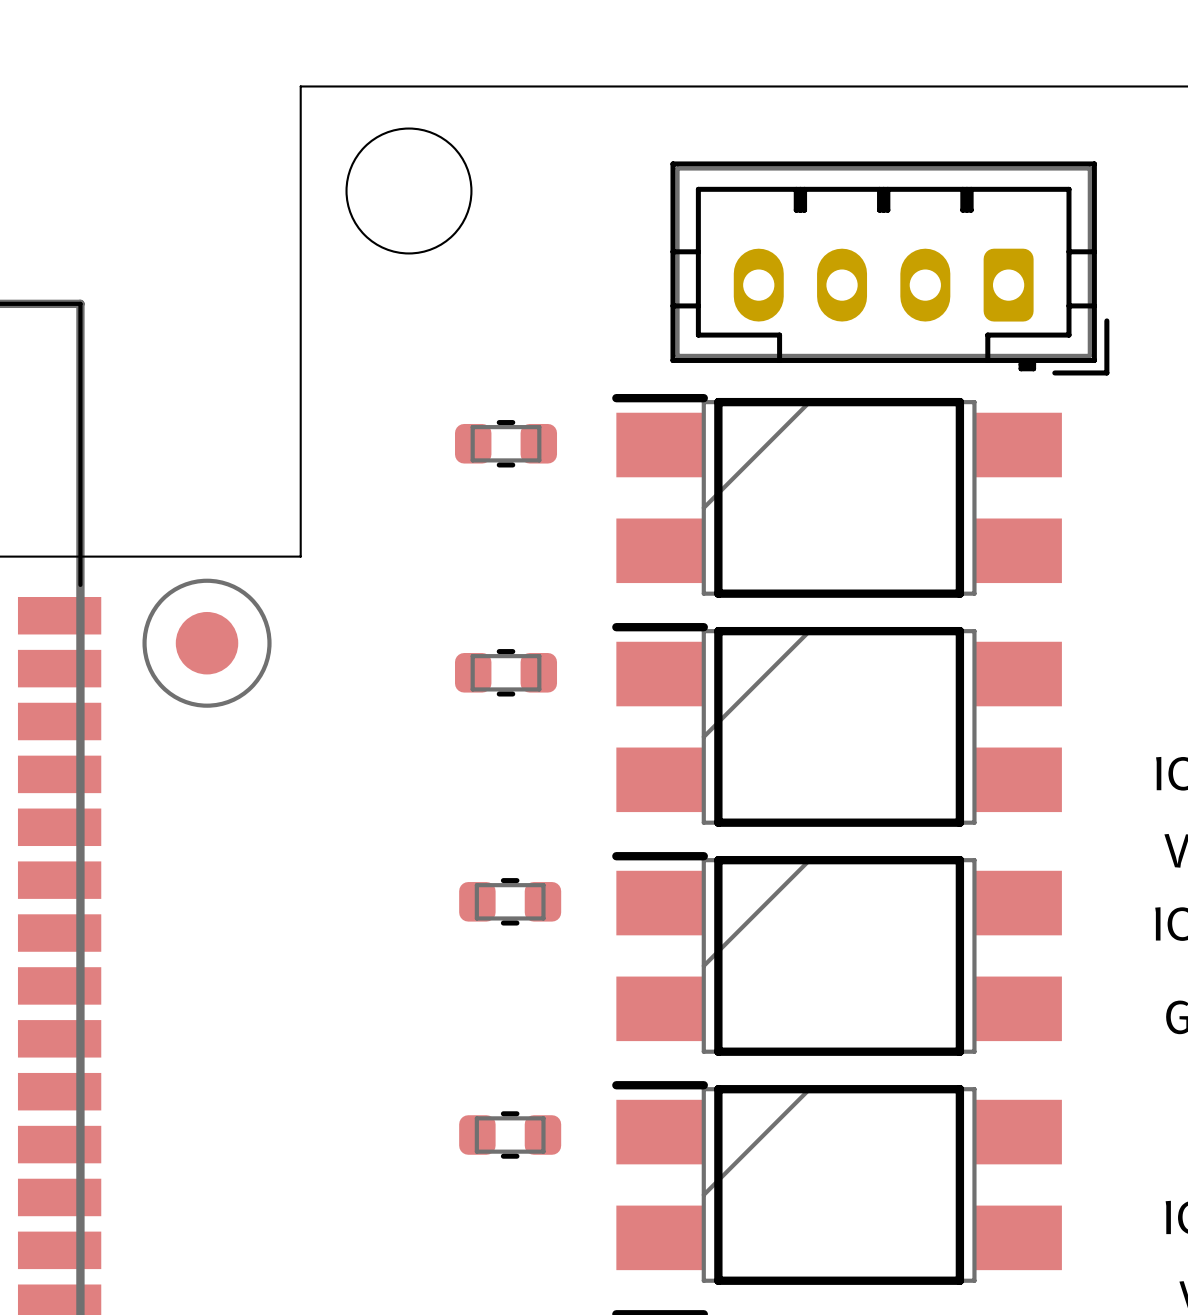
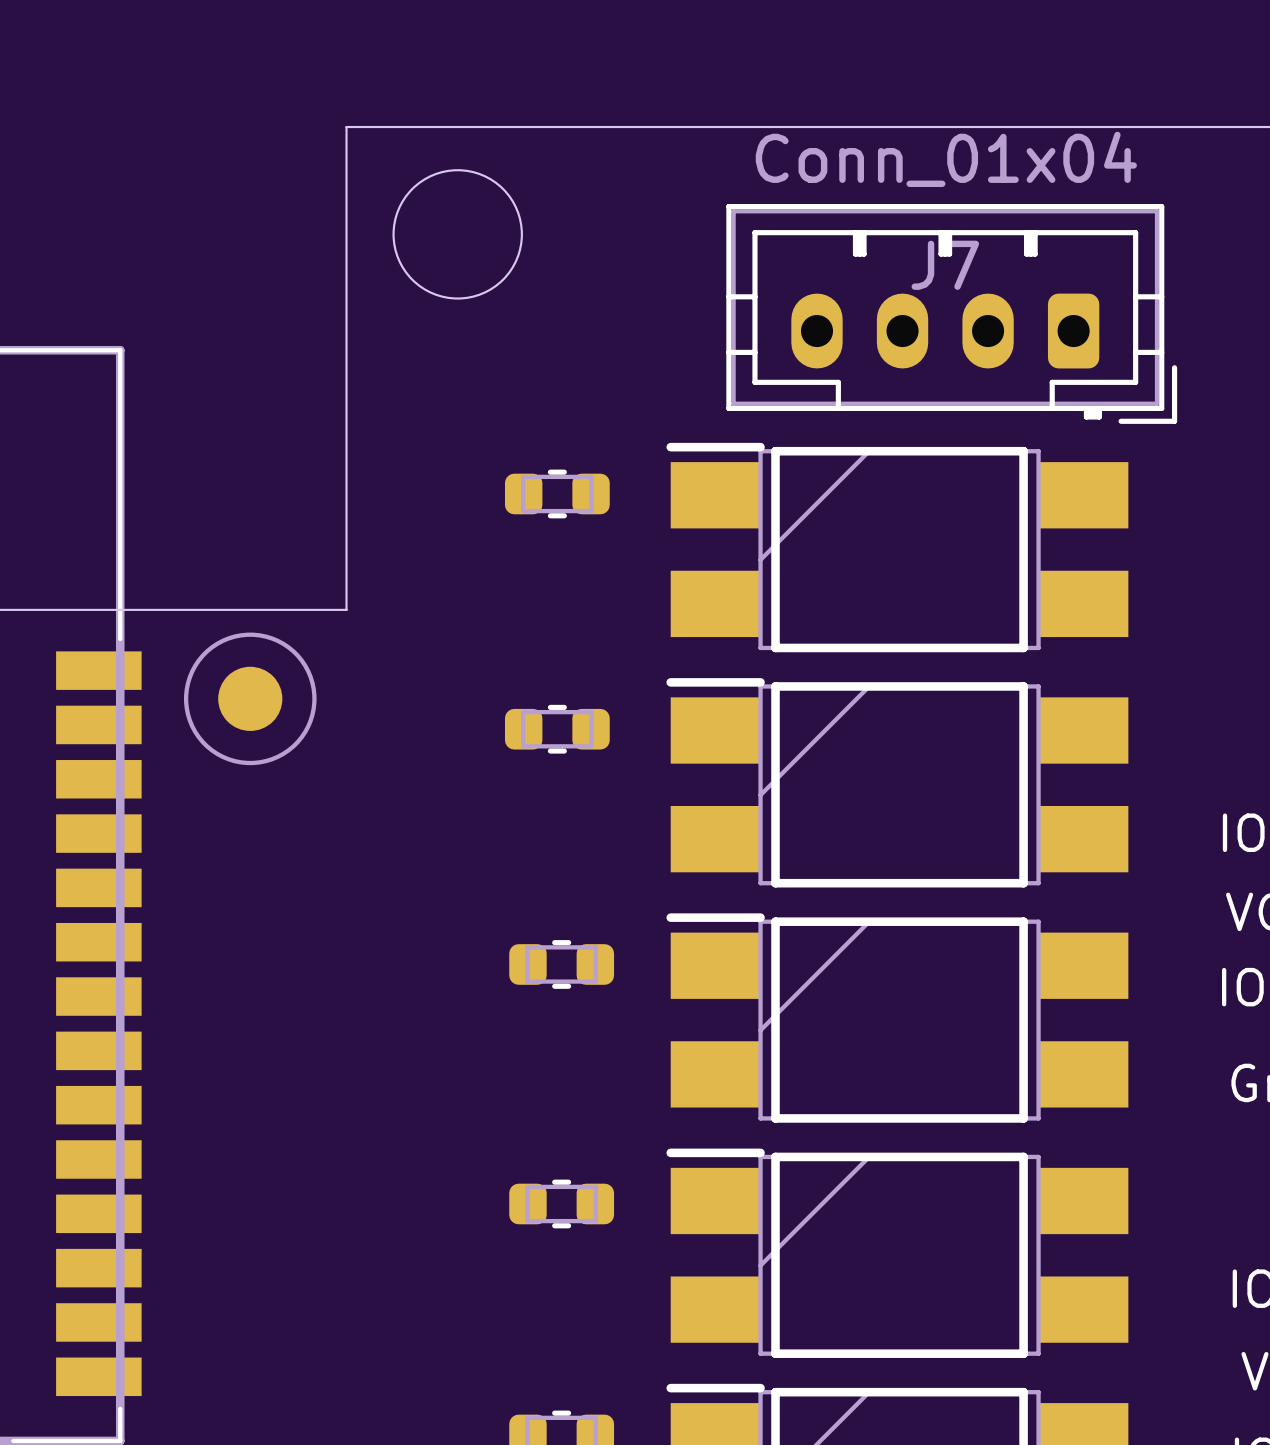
J7 value: none -> Conn_01x04 (946, 159)
J7 name: none -> J7 (945, 265)

